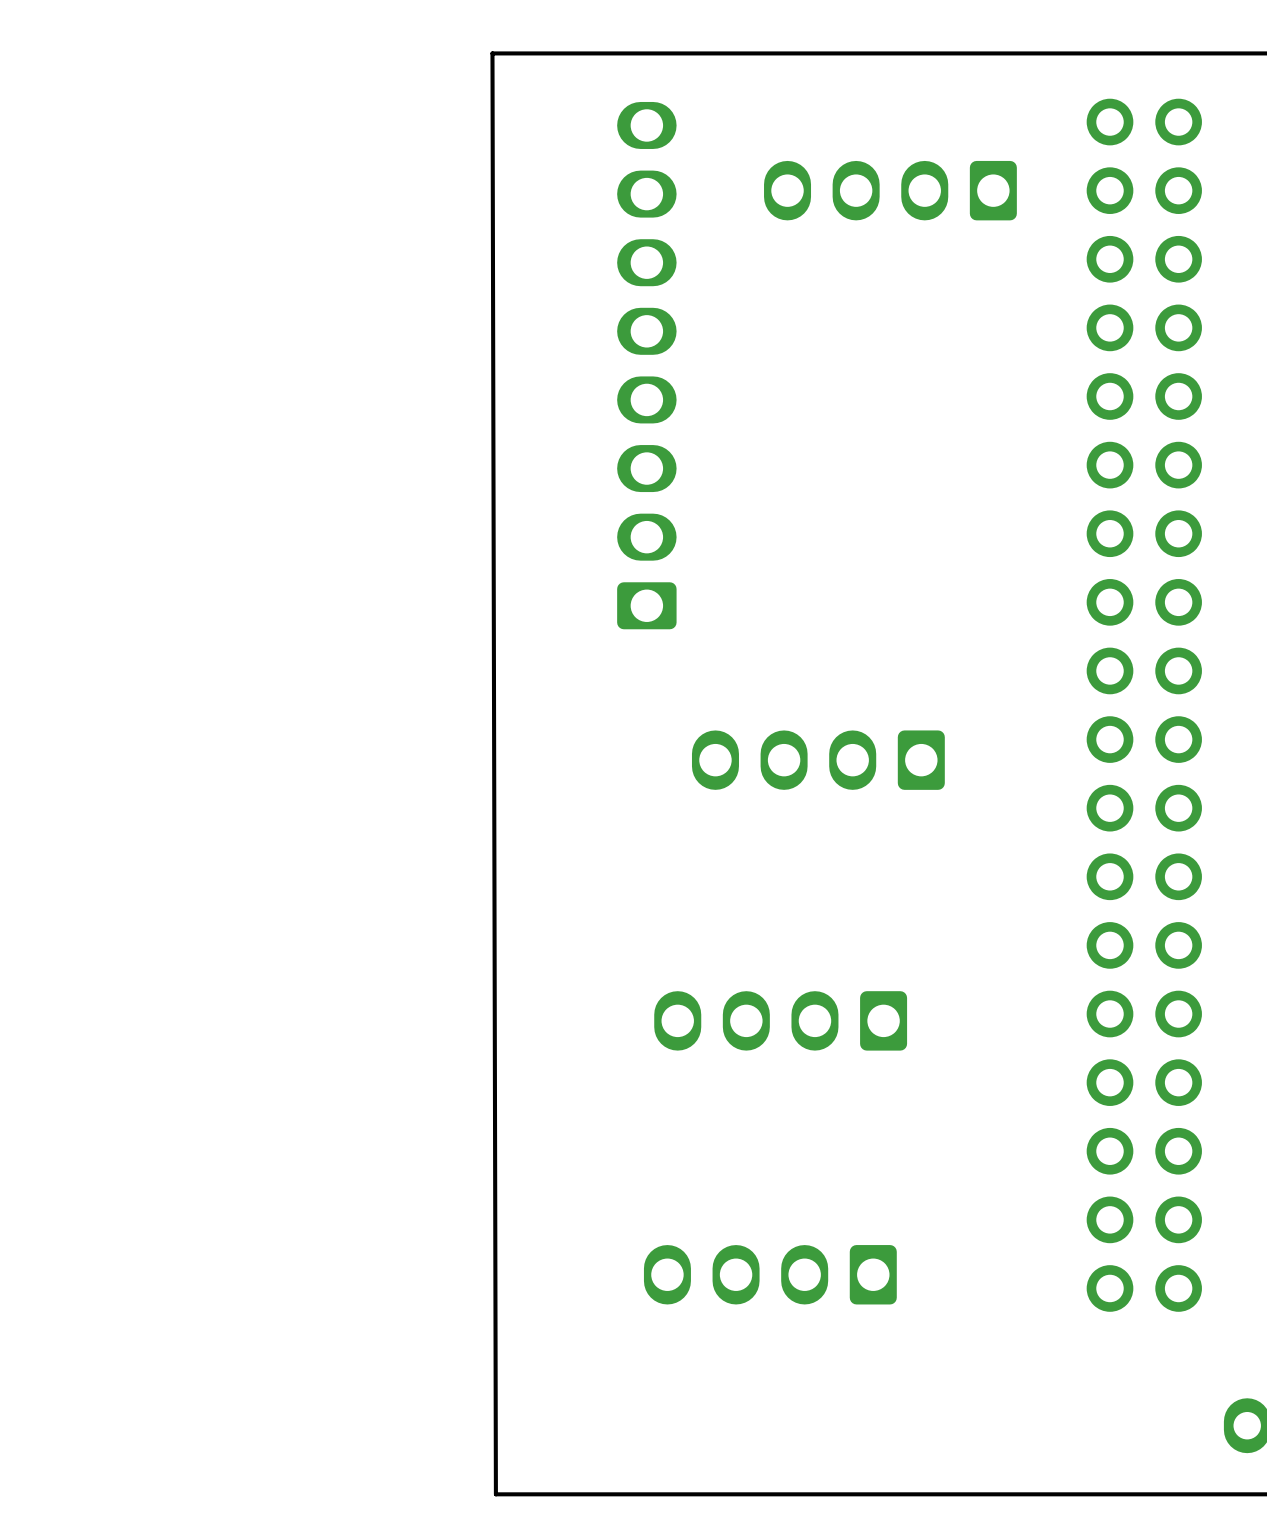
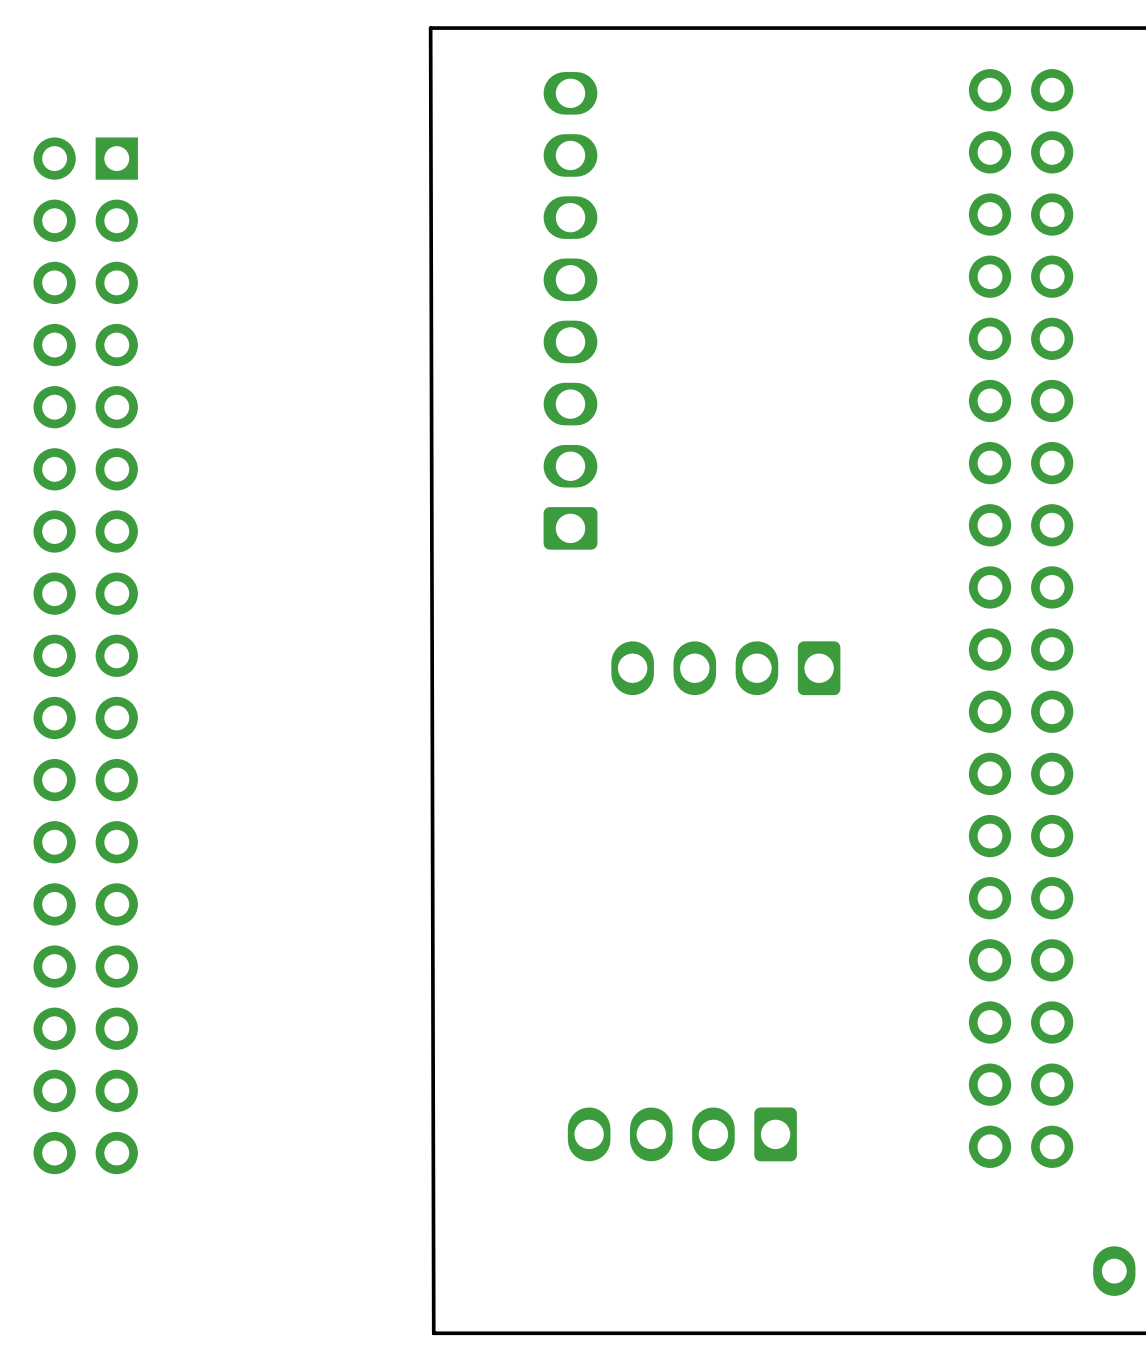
part: (890, 190) -> none
part: none -> (85, 655)
part: (780, 1020) -> none

